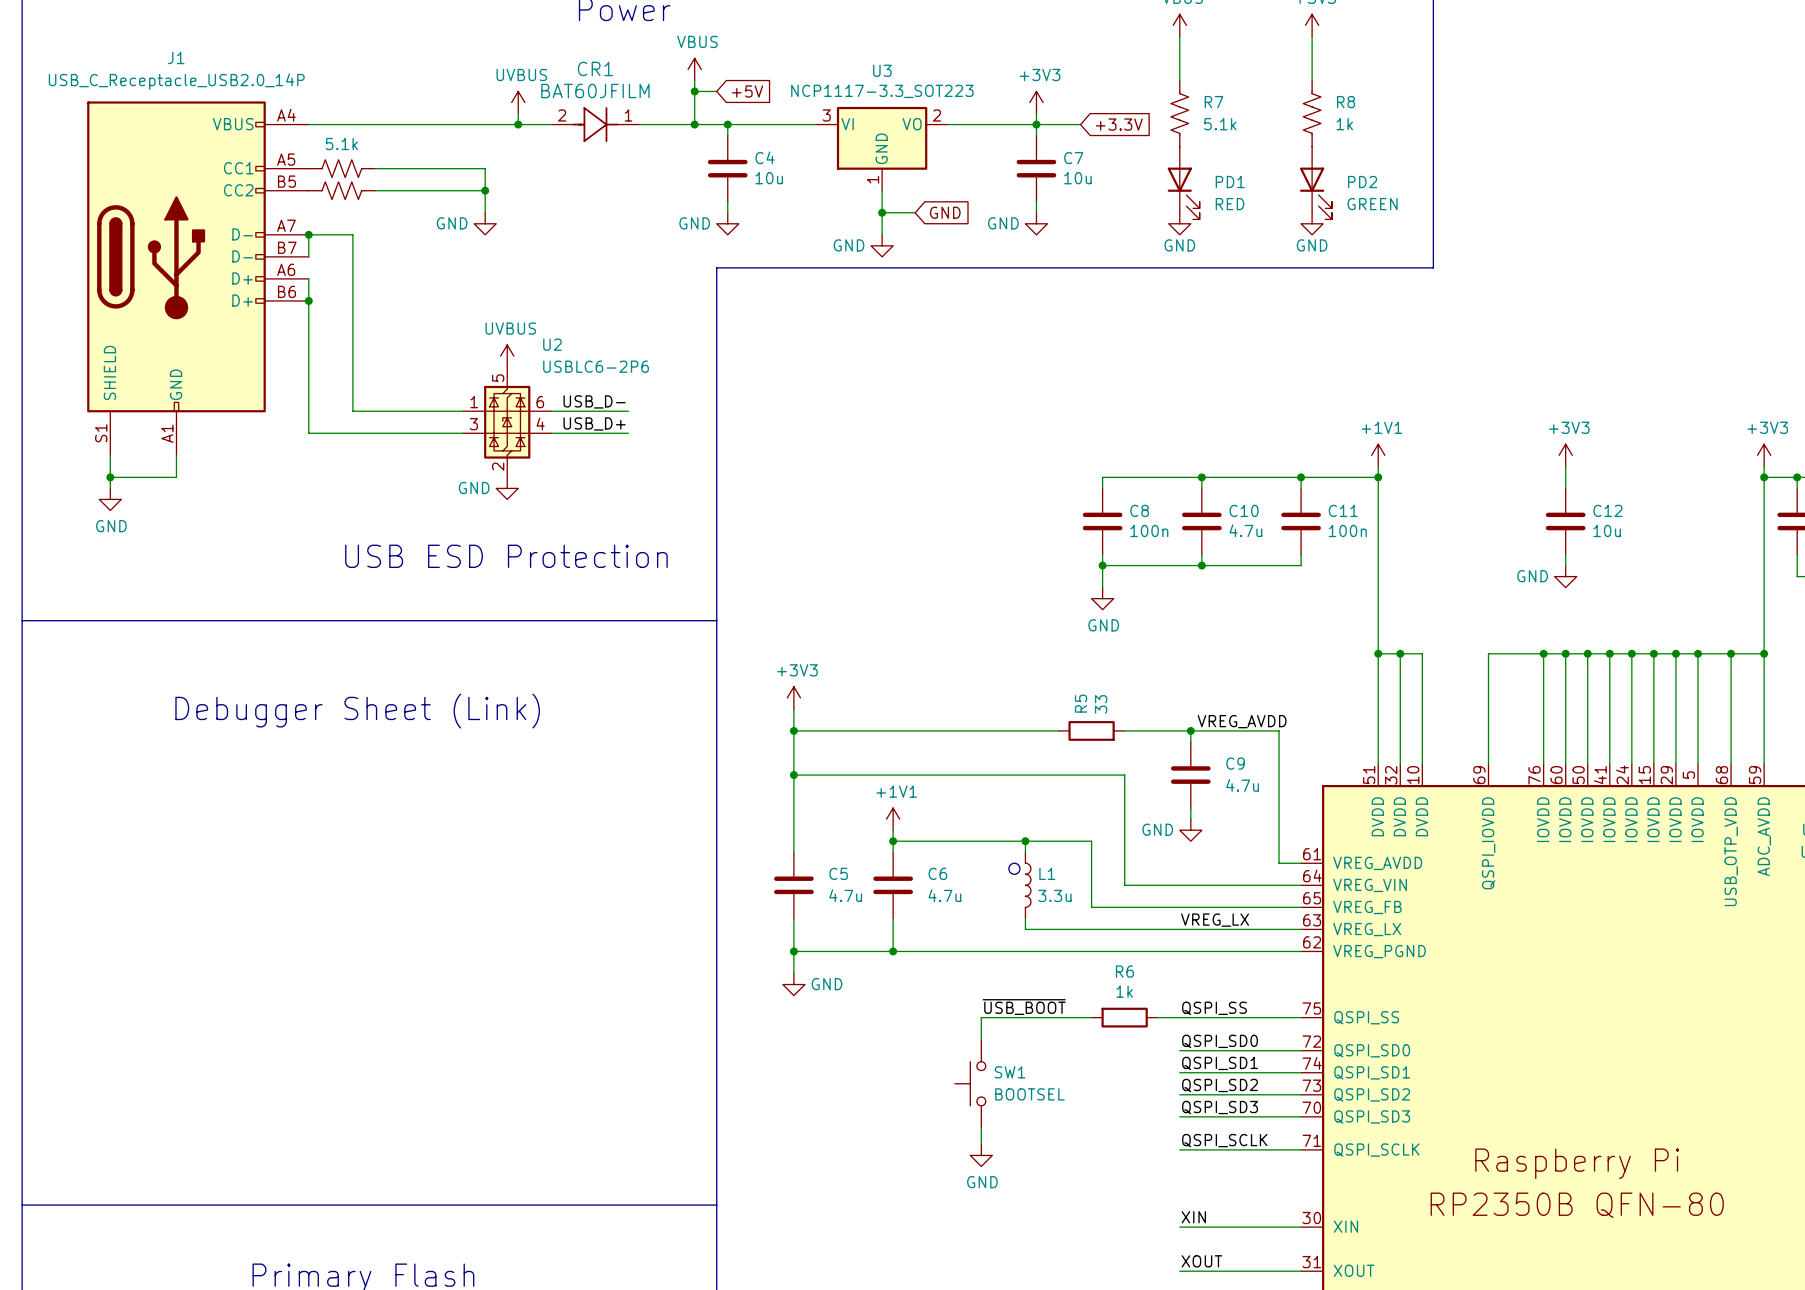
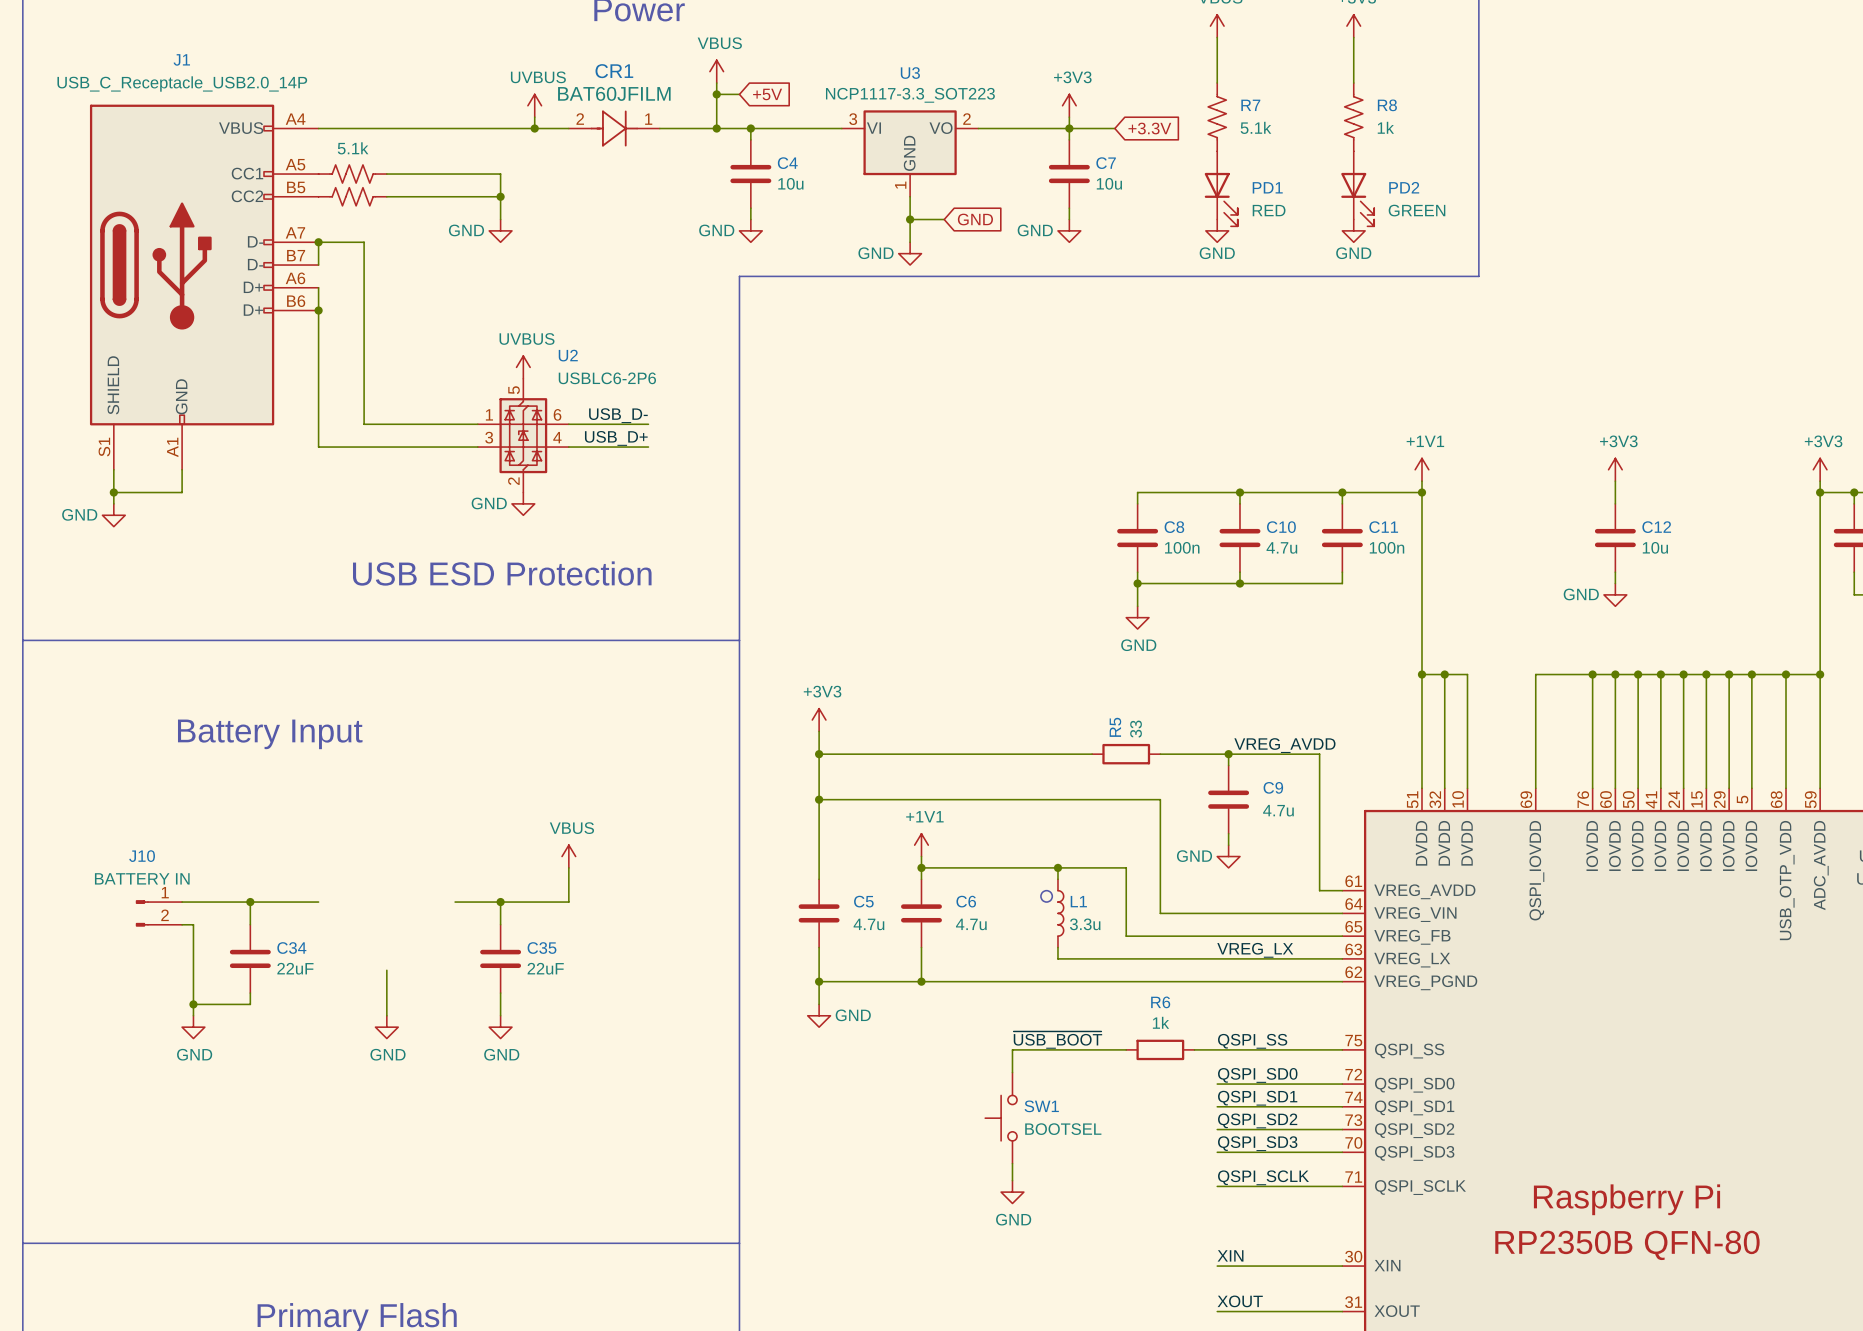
power symbol text position: GND (111, 526) -> GND (79, 514)
text: Debugger Sheet (Link) (357, 711) -> Battery Input (270, 734)
power symbol: none -> VBUS (568, 856)
wire: none -> (568, 867) (568, 902) (455, 902)
wire: none -> (182, 902) (318, 902)
wire: none -> (250, 902) (250, 924)
junction: none -> (250, 902)
wire: none -> (500, 902) (500, 924)
junction: none -> (500, 902)
J10: none -> BATTERY IN (158, 913)
wire: none -> (182, 924) (193, 924) (193, 1015)
C34: none -> 22uF (250, 958)
C35: none -> 22uF (500, 958)
wire: none -> (386, 970) (386, 1015)
wire: none -> (250, 993) (250, 1004) (193, 1004)
wire: none -> (500, 993) (500, 1015)
junction: none -> (193, 1004)
power symbol: none -> GND (193, 1027)
power symbol: none -> GND (386, 1027)
power symbol: none -> GND (500, 1027)

